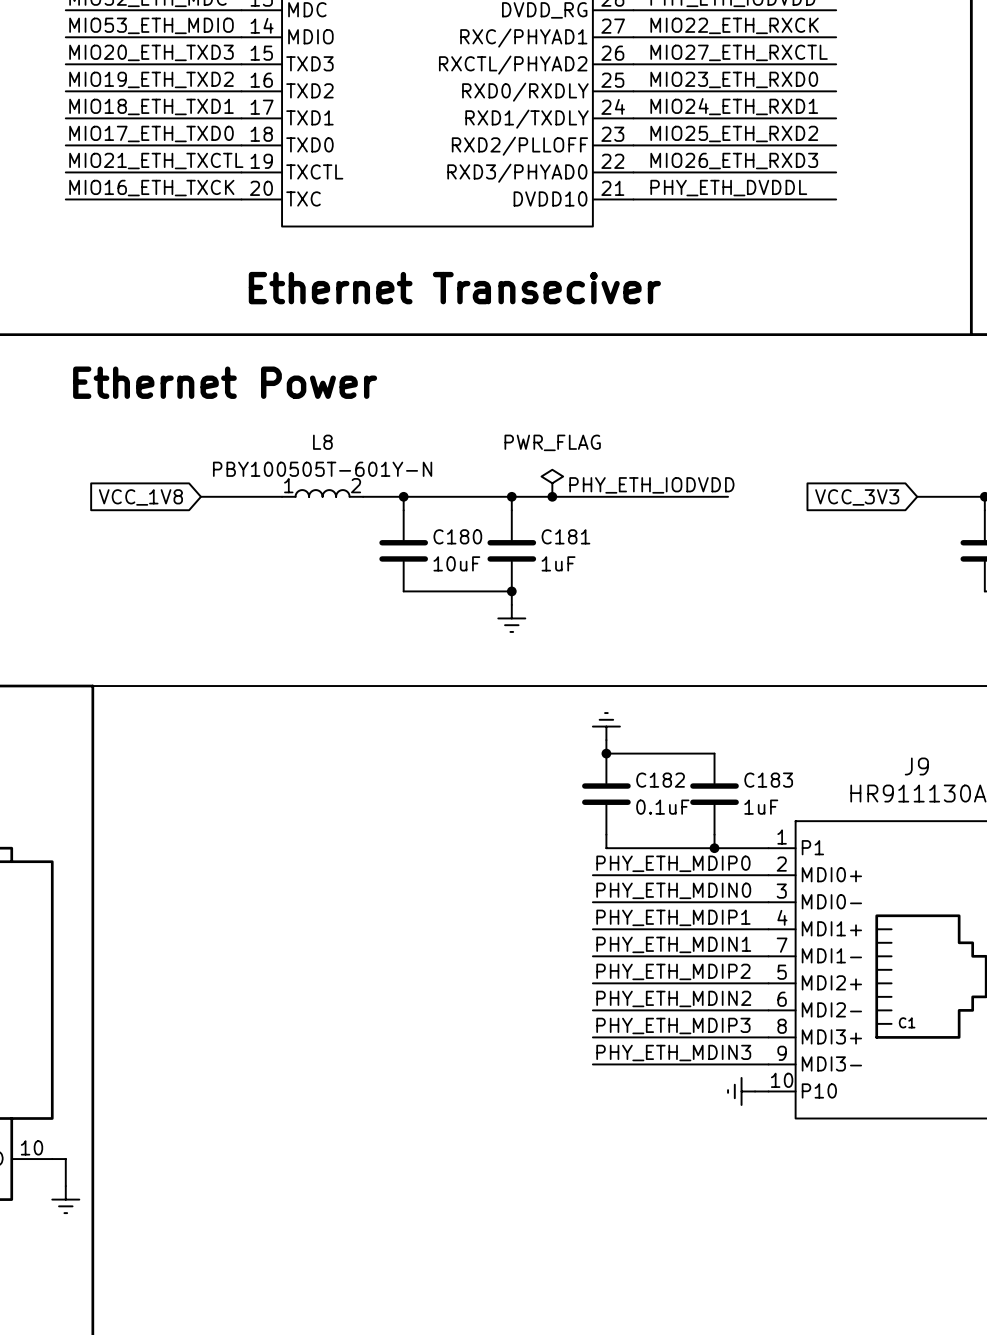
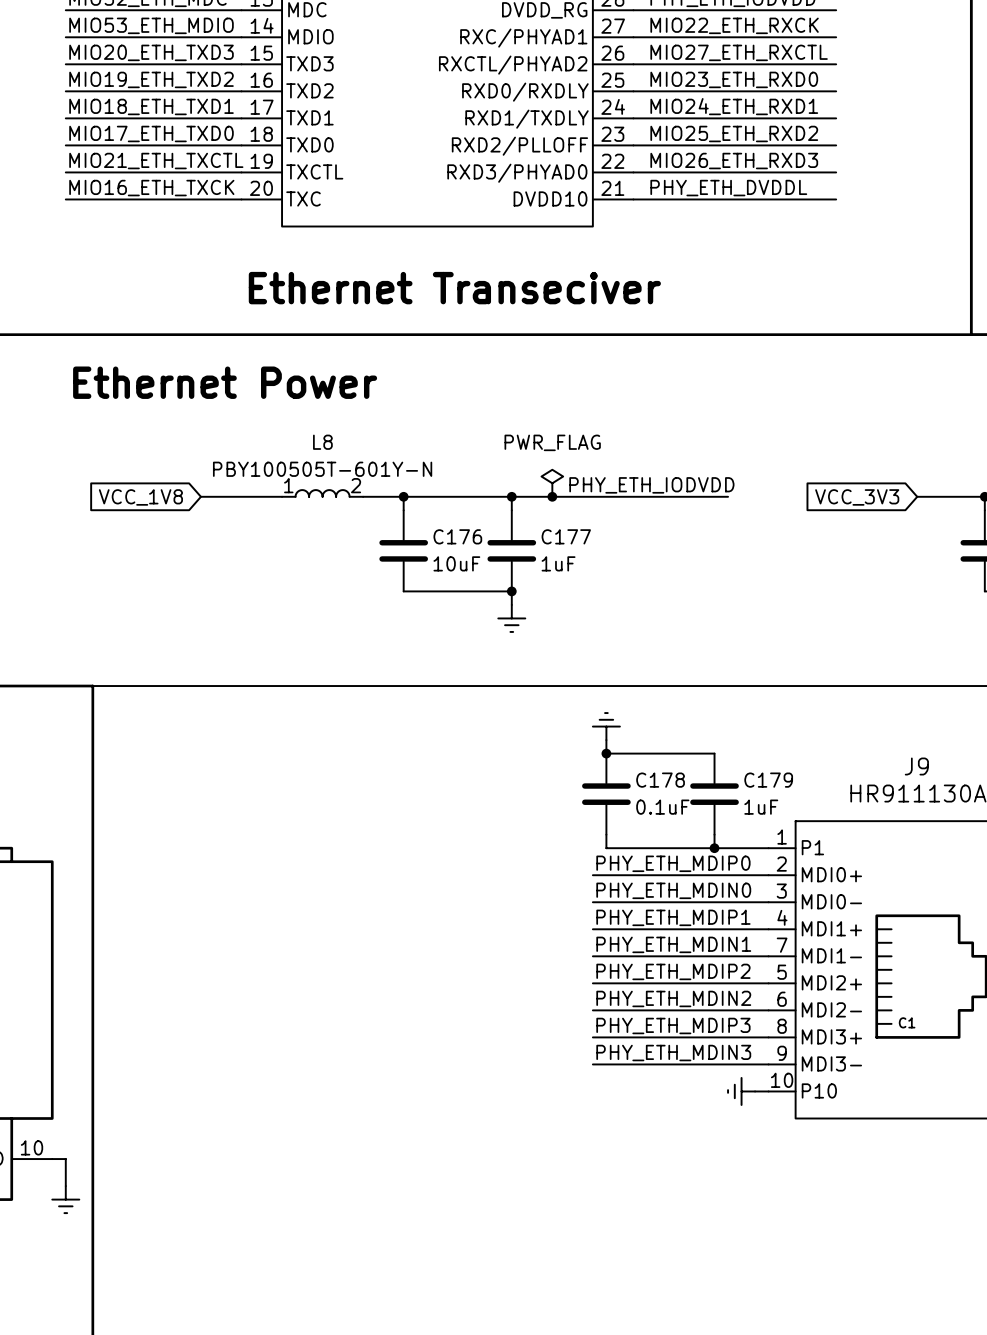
C180 name: C180 (457, 536) -> C176 (457, 536)
C181 name: C181 (565, 536) -> C177 (566, 536)
C182 name: C182 (660, 780) -> C178 (660, 780)
C183 name: C183 (768, 780) -> C179 (768, 780)

